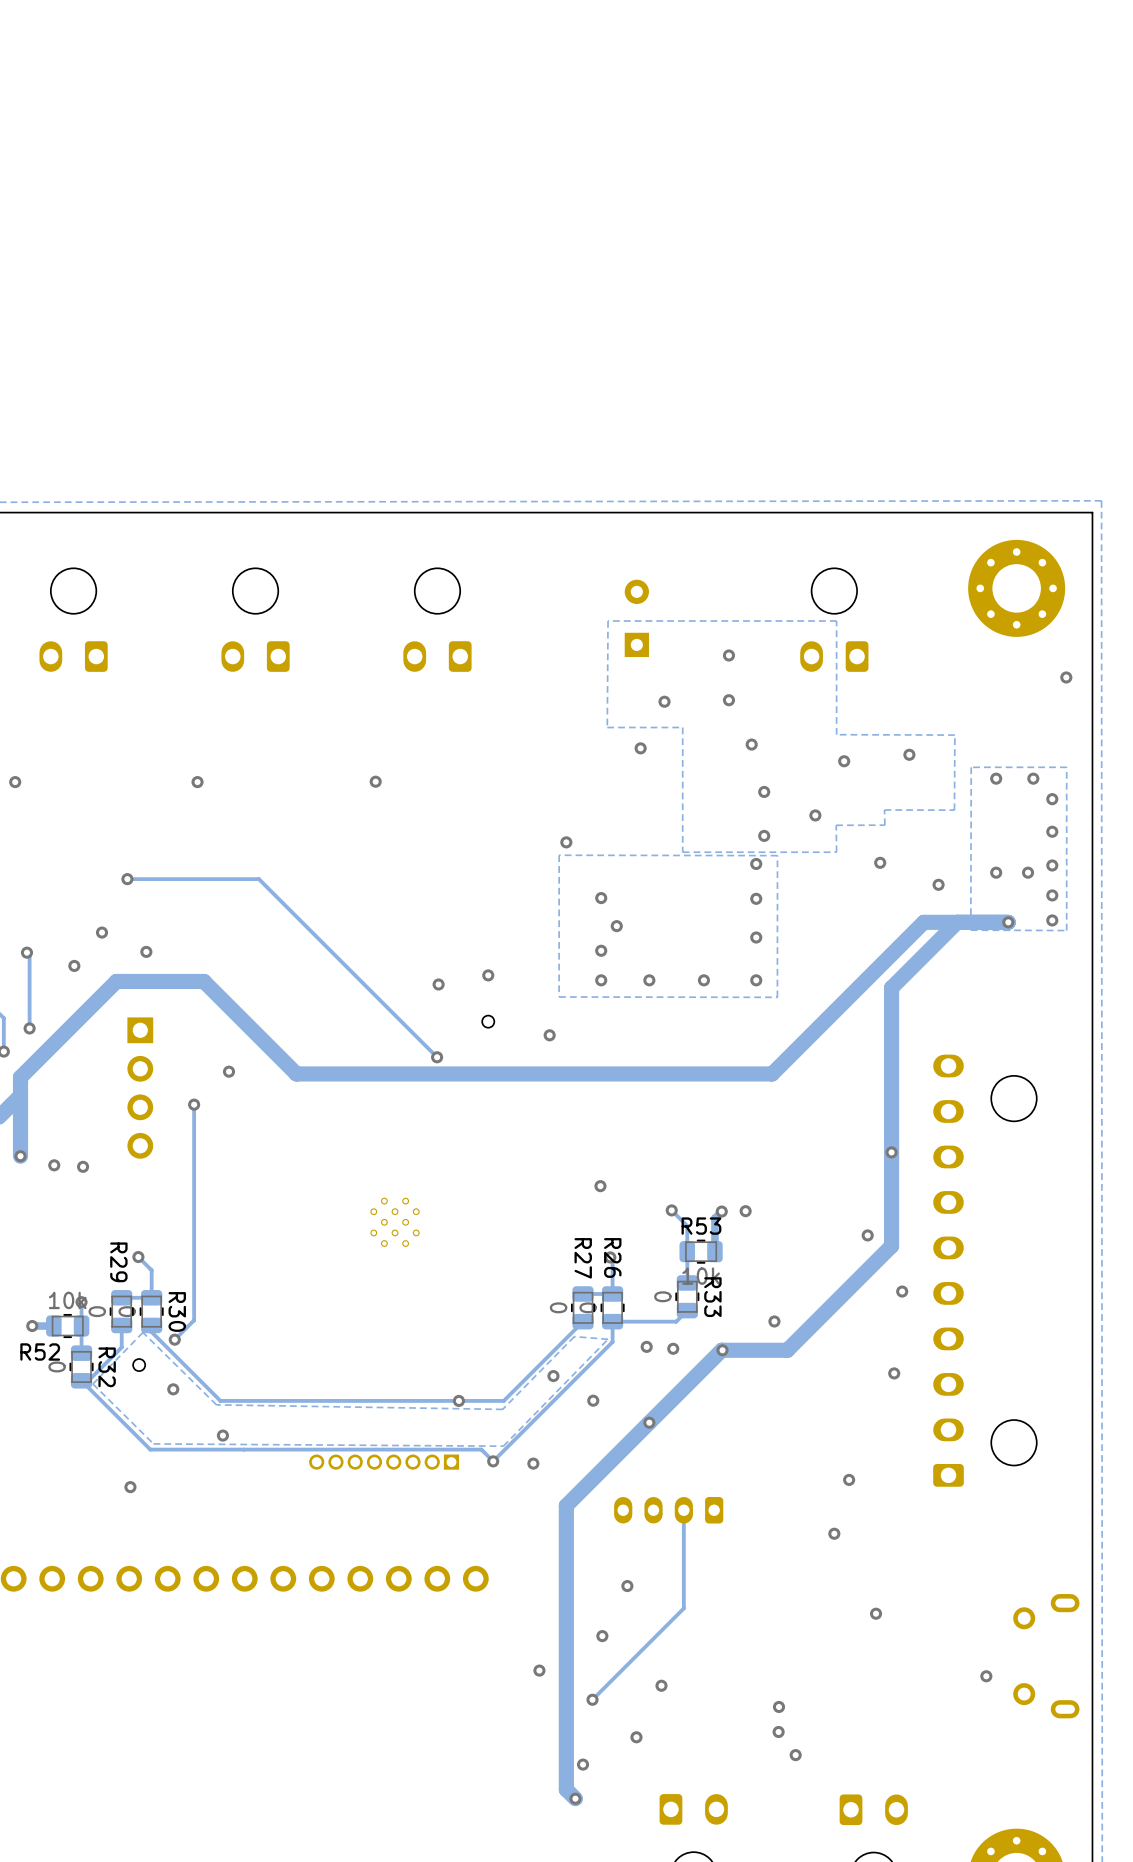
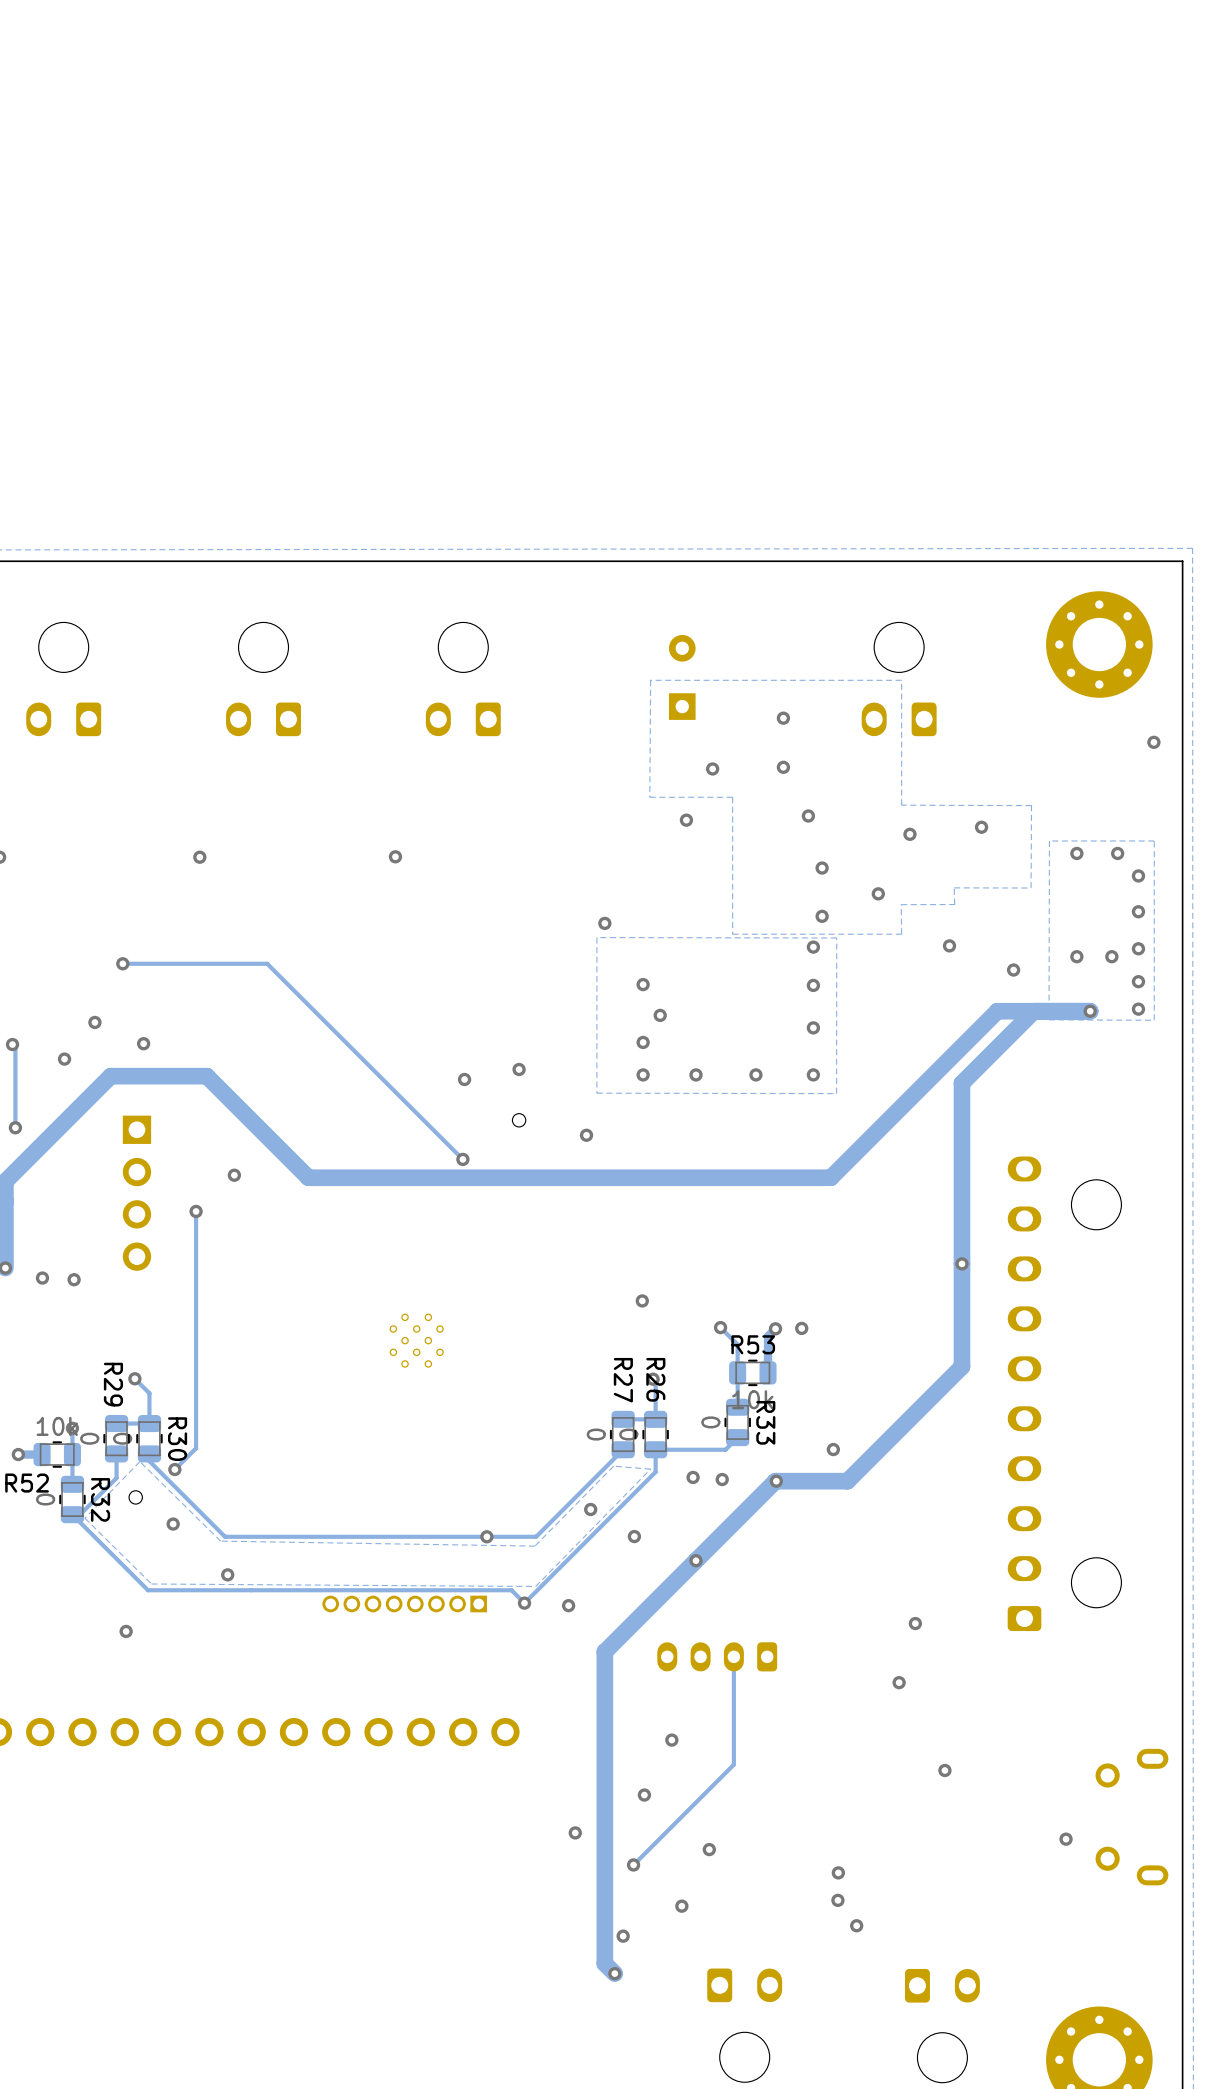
via: (867, 1235) -> none
via: (902, 1291) -> none
via: (894, 1373) -> none

